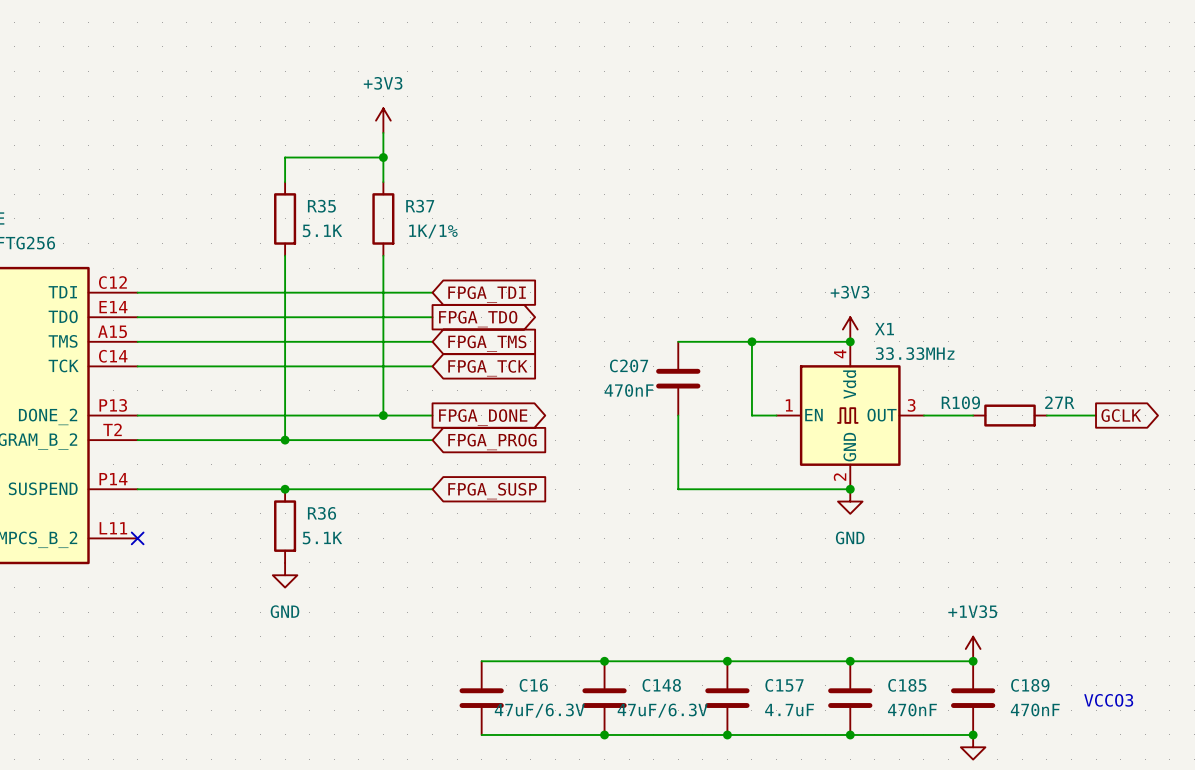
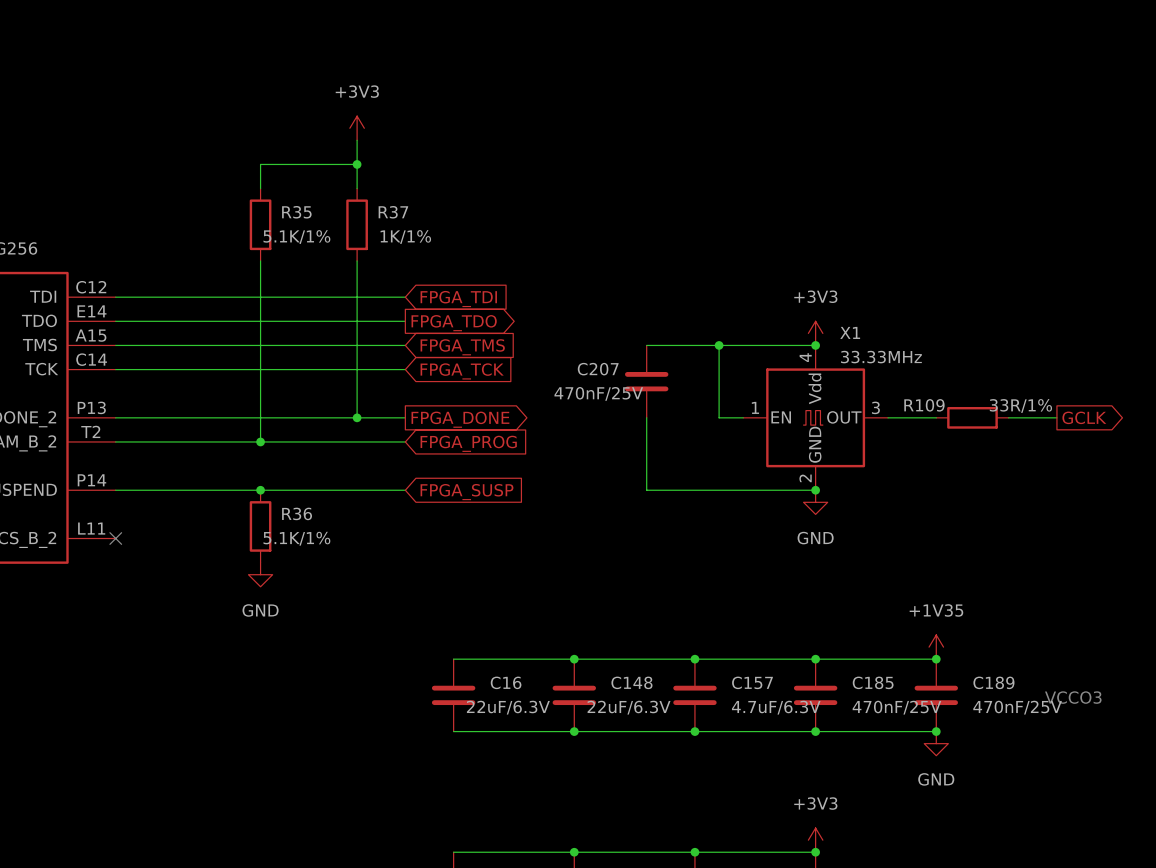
R35 value: 5.1K (322, 230) -> 5.1K/1% (296, 237)
C207 value: 470nF (629, 390) -> 470nF/25V (598, 393)
R109 value: 27R (1059, 402) -> 33R/1% (1020, 405)
R36 value: 5.1K (322, 538) -> 5.1K/1% (296, 538)
C185 value: 470nF (912, 709) -> 470nF/25V (896, 707)
C189 value: 470nF (1035, 709) -> 470nF/25V (1017, 707)
C16 value: 47uF/6.3V (539, 710) -> 22uF/6.3V (508, 707)
C148 value: 47uF/6.3V (662, 710) -> 22uF/6.3V (629, 707)
C157 value: 4.7uF (789, 710) -> 4.7uF/6.3V (776, 707)

